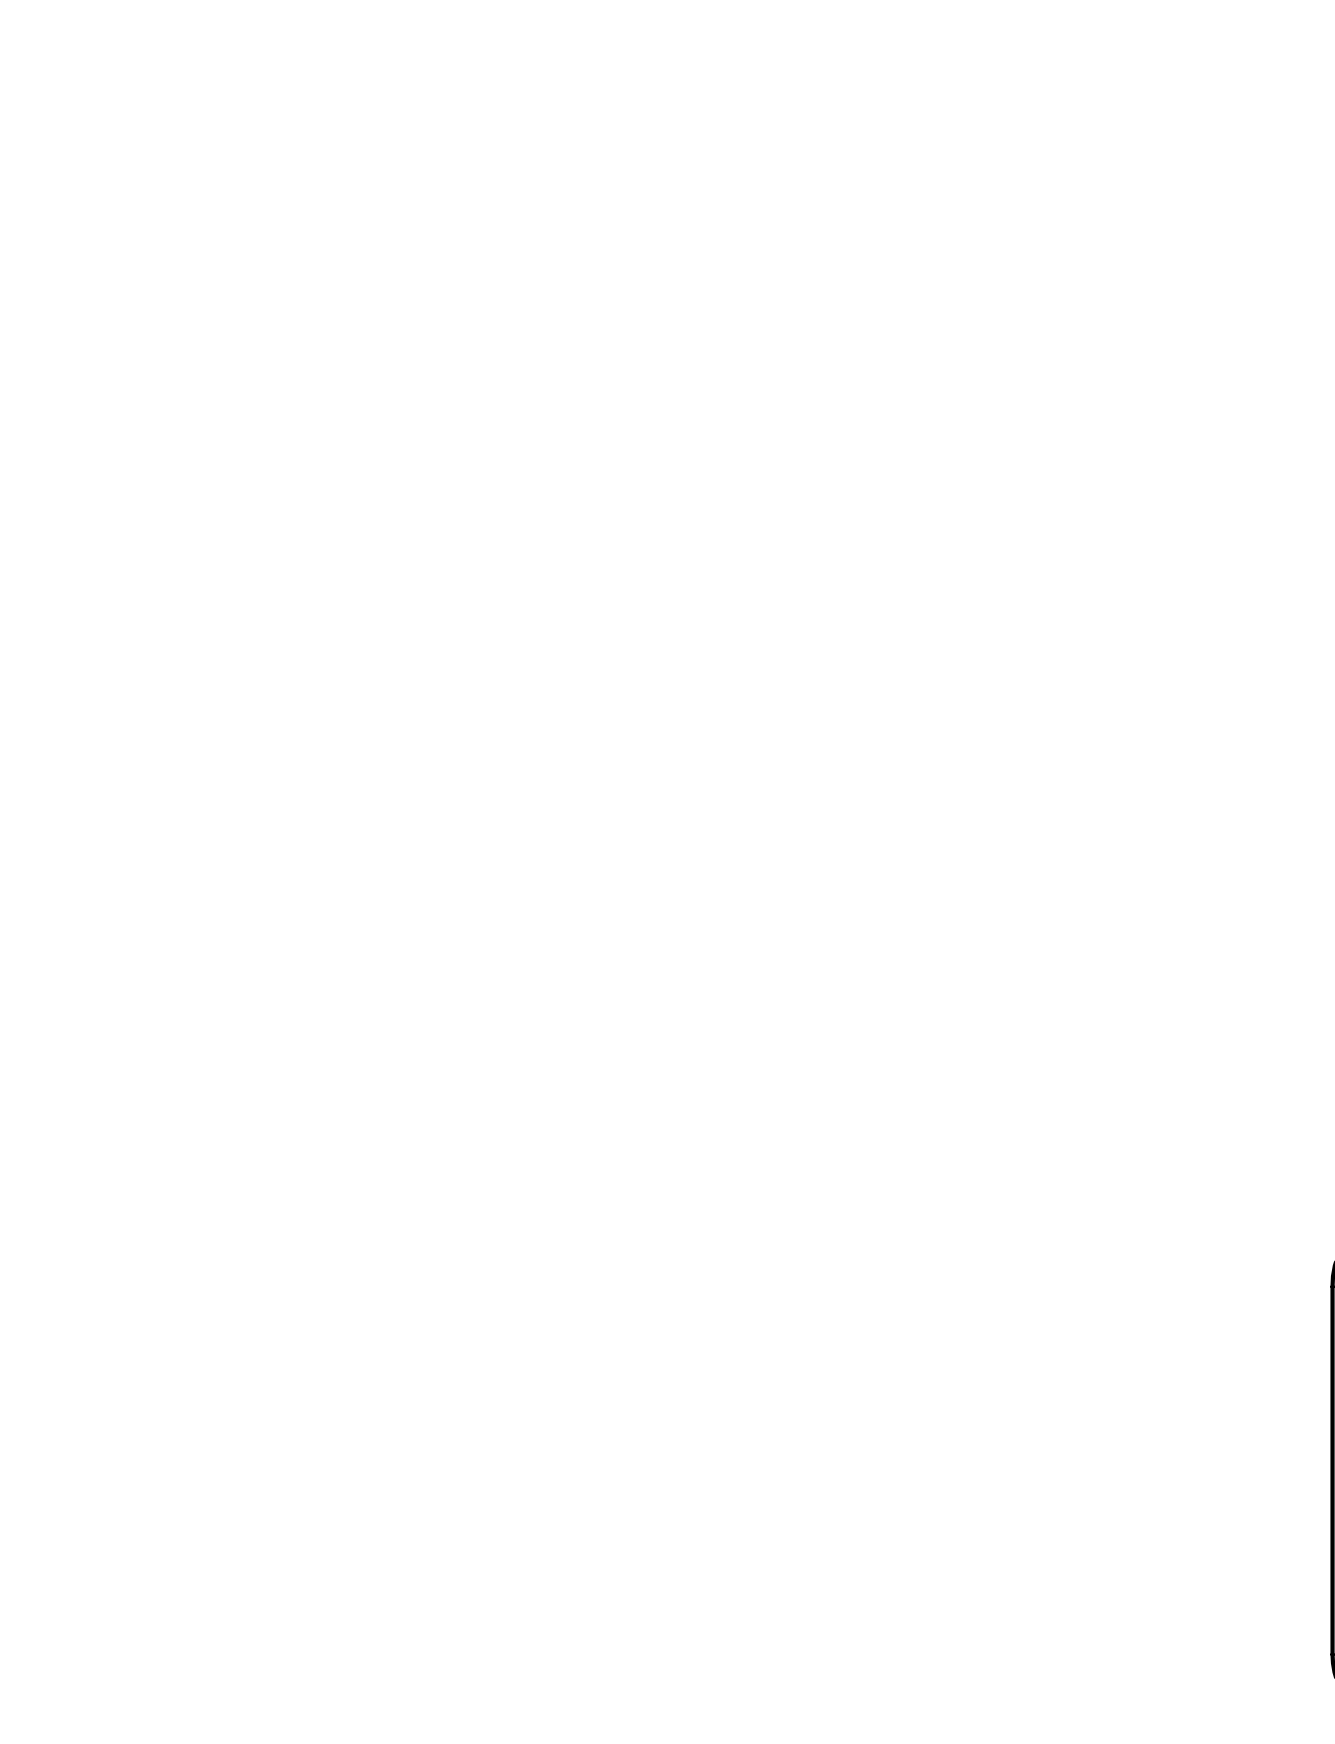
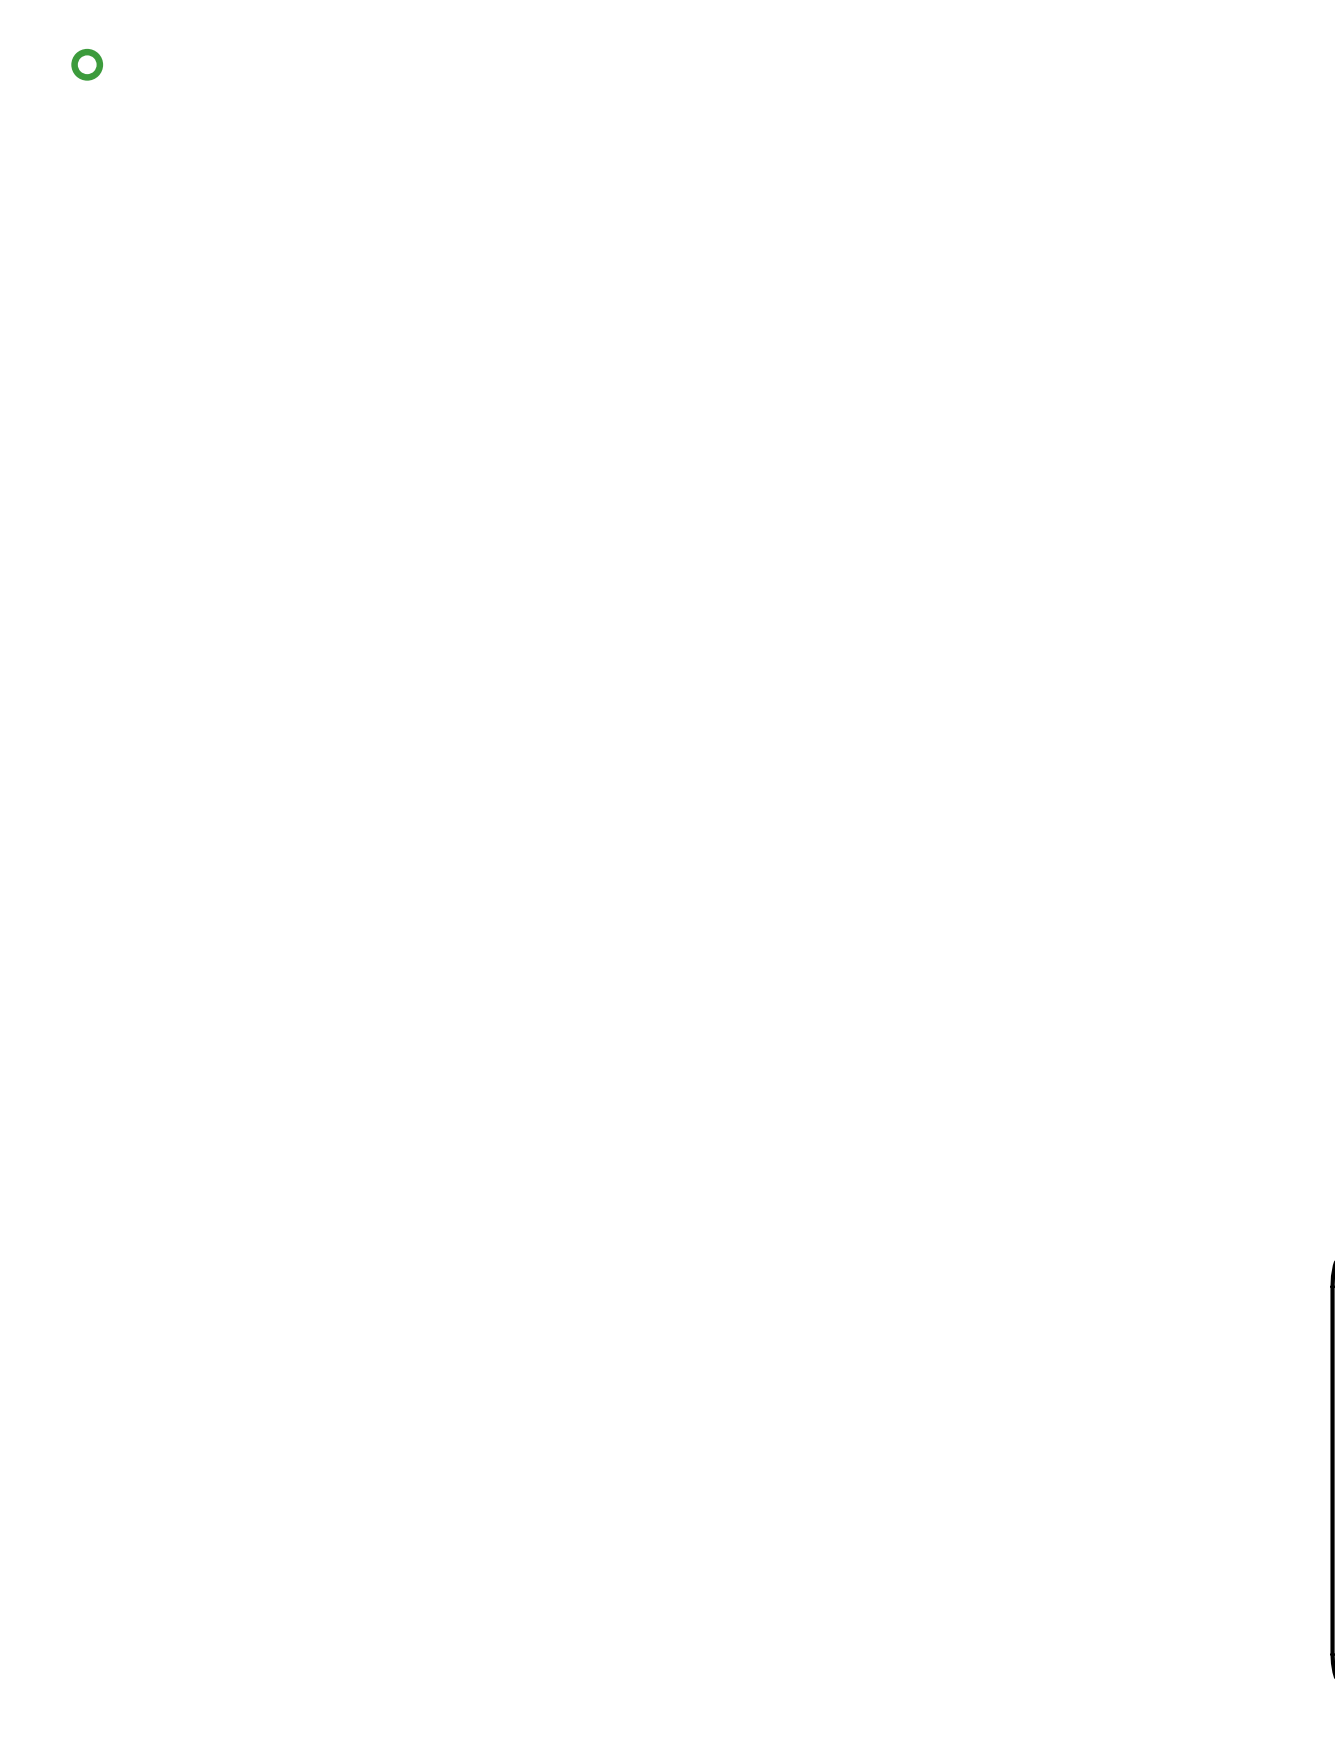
part: none -> (87, 64)

